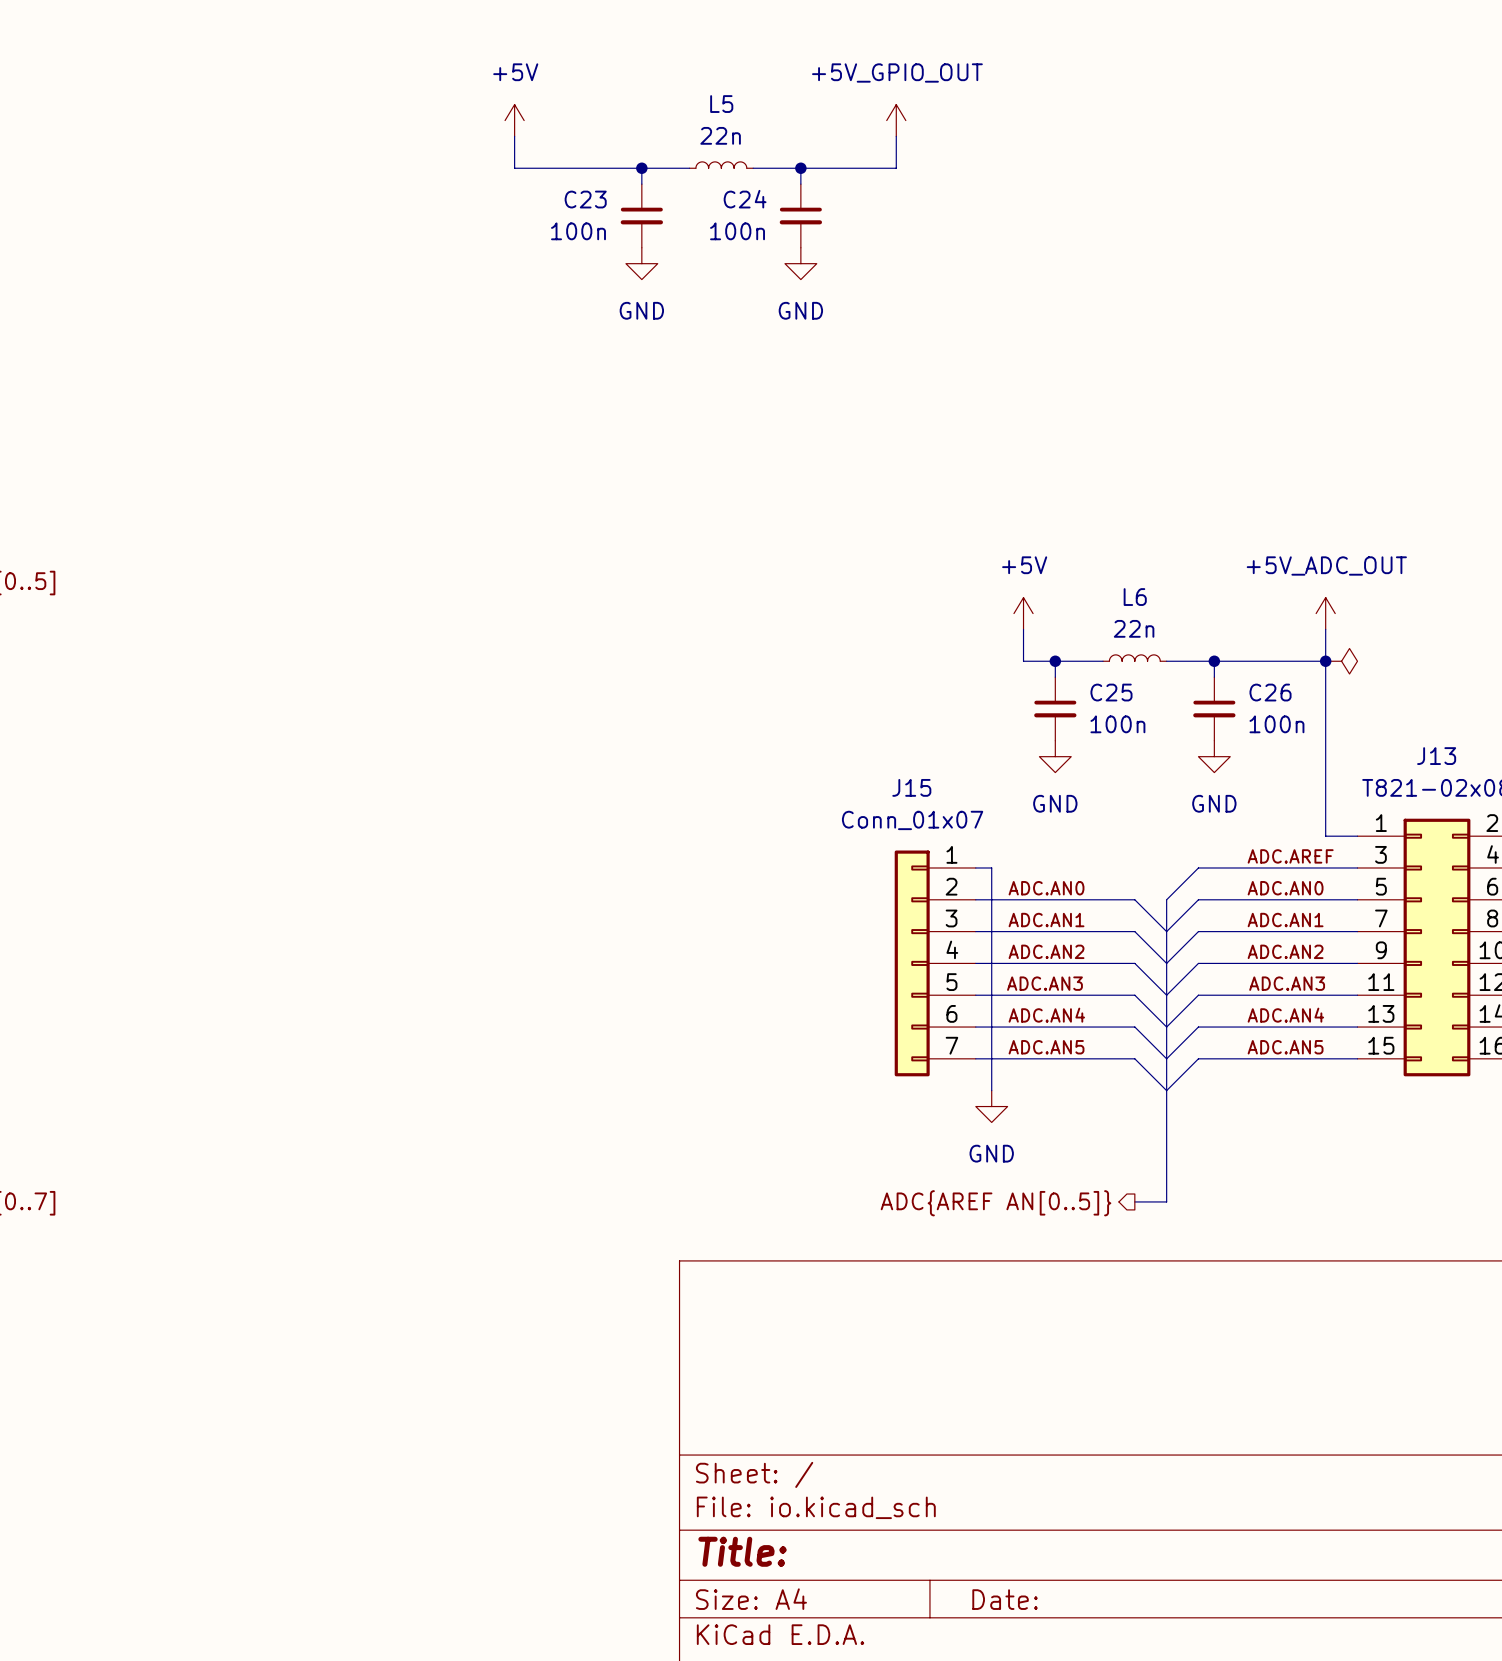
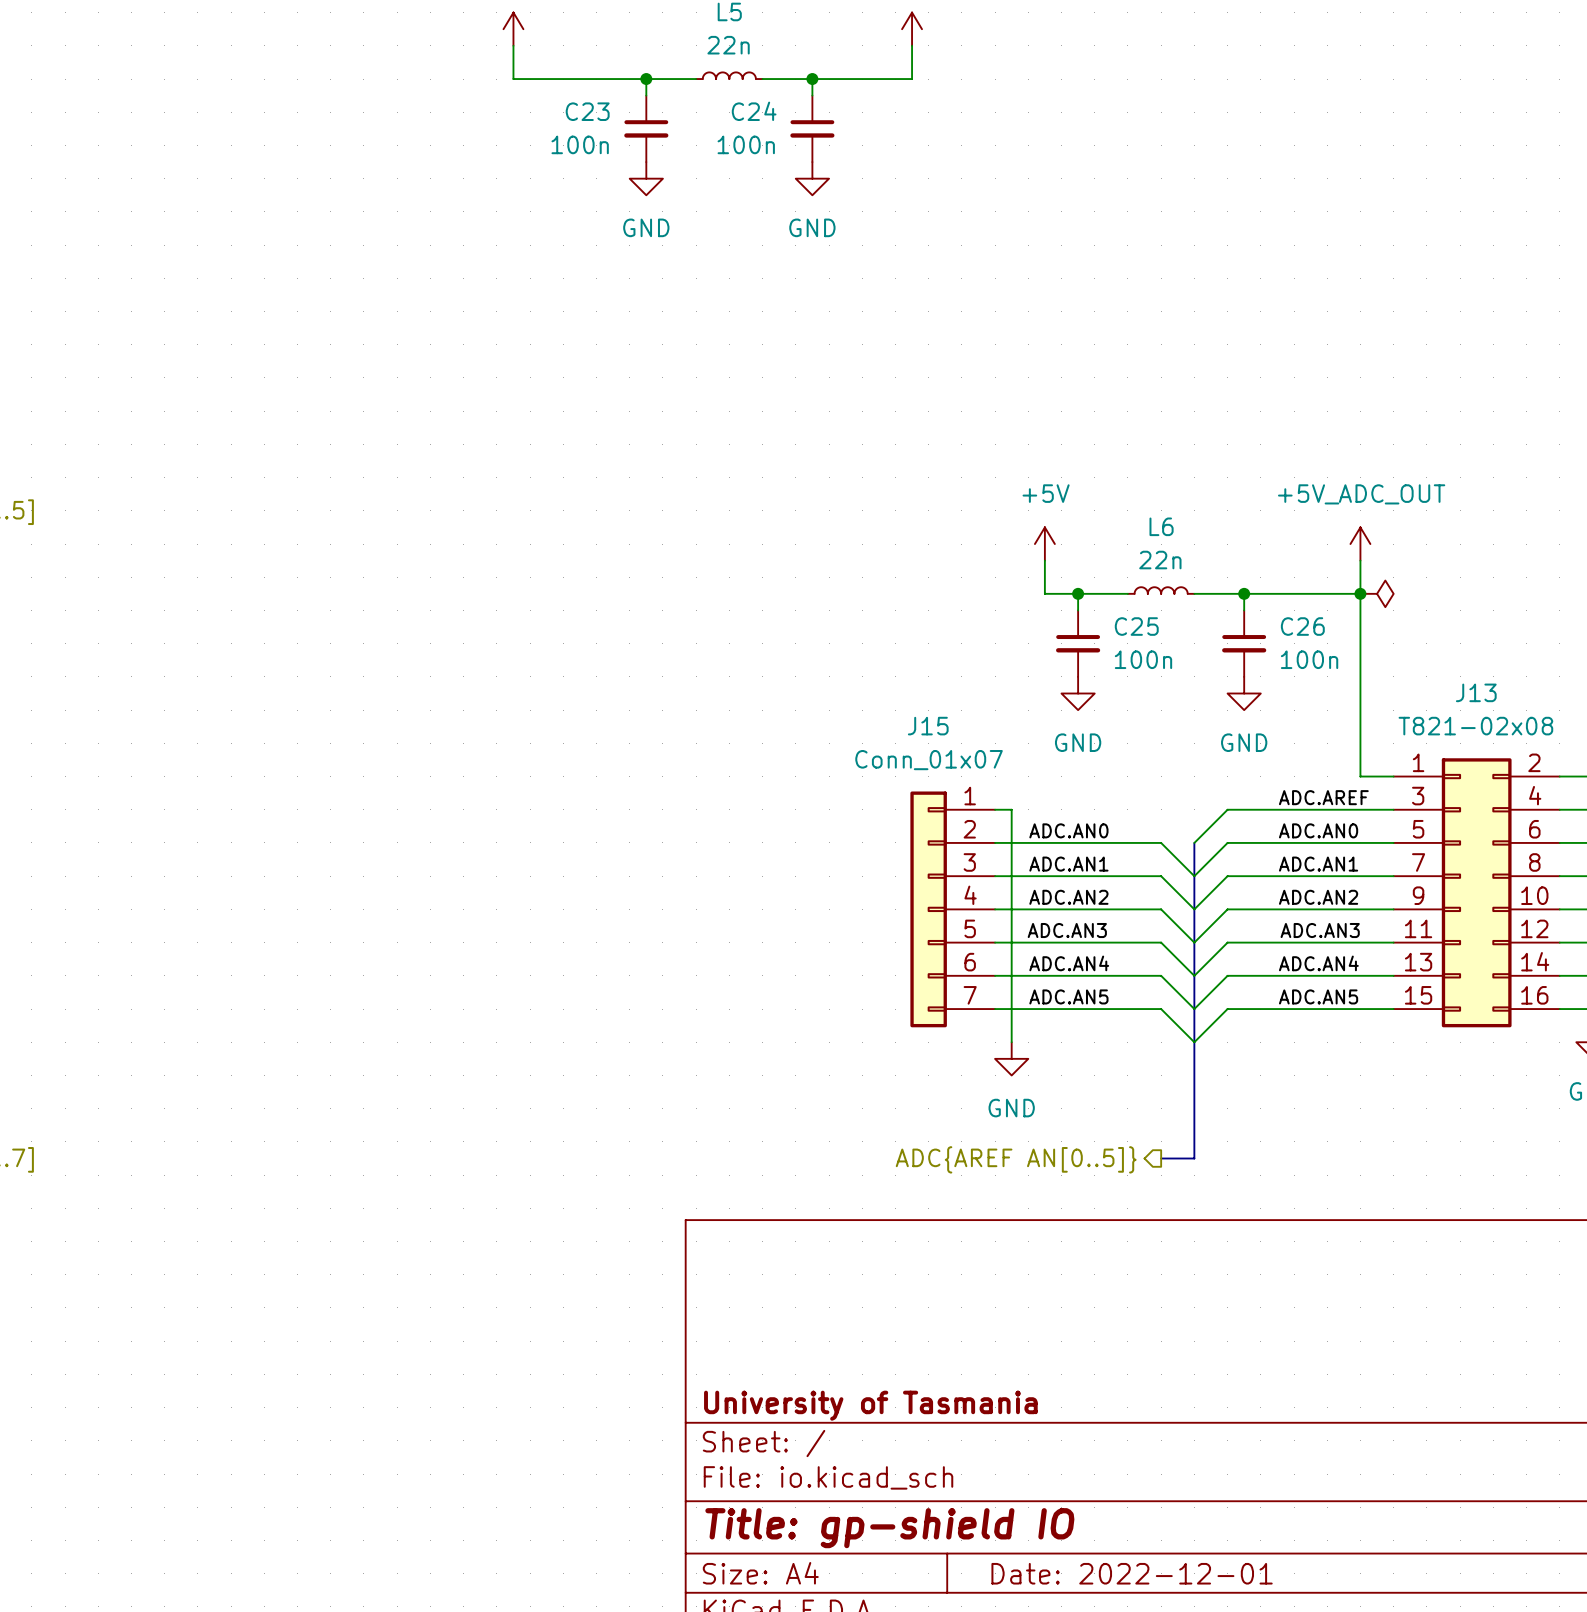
title block: none -> University of Tasmania (870, 1405)
title block: Title: (742, 1551) -> Title: gp-shield IO (889, 1528)
title block: Date: (1005, 1599) -> Date: 2022-12-01 (1132, 1573)

